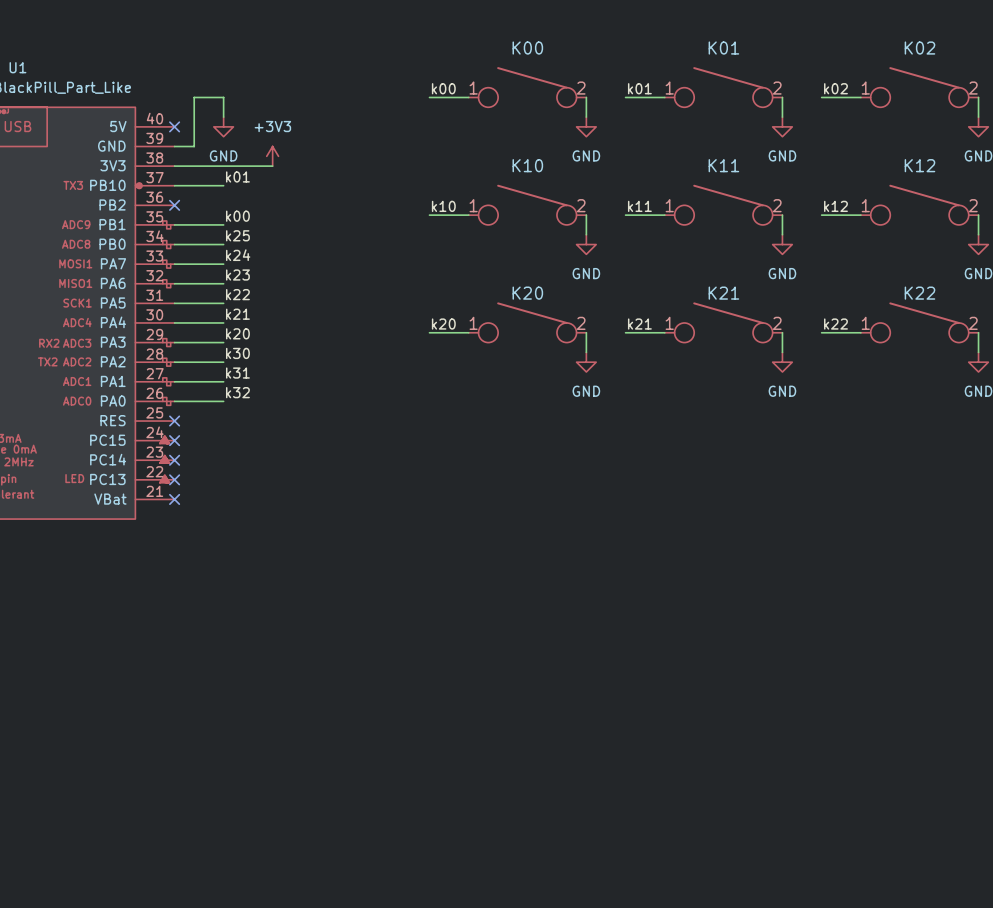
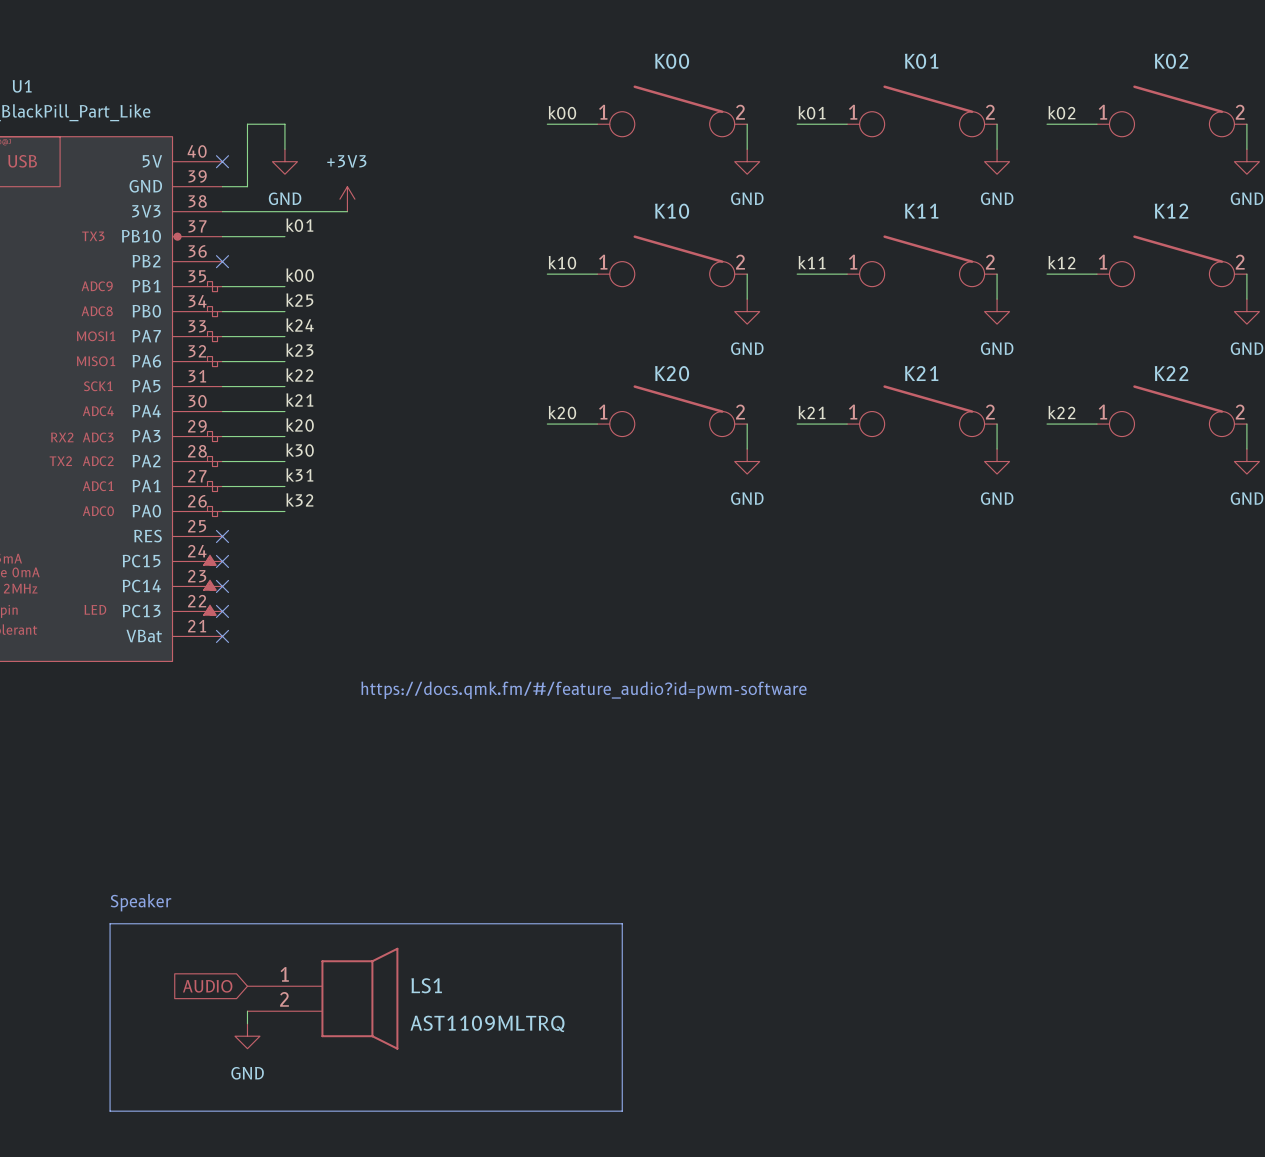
text: none -> https://docs.qmk.fm/#/feature_audio?id=pwm-software (583, 690)
text: none -> Speaker (141, 902)
line: none -> (110, 923) (622, 923) (622, 1111) (110, 1111) (110, 923)
global label: none -> AUDIO (207, 986)
LS1: none -> AST1109MLTRQ (322, 998)
wire: none -> (247, 1011) (247, 1023)
power symbol: none -> GND (247, 1036)

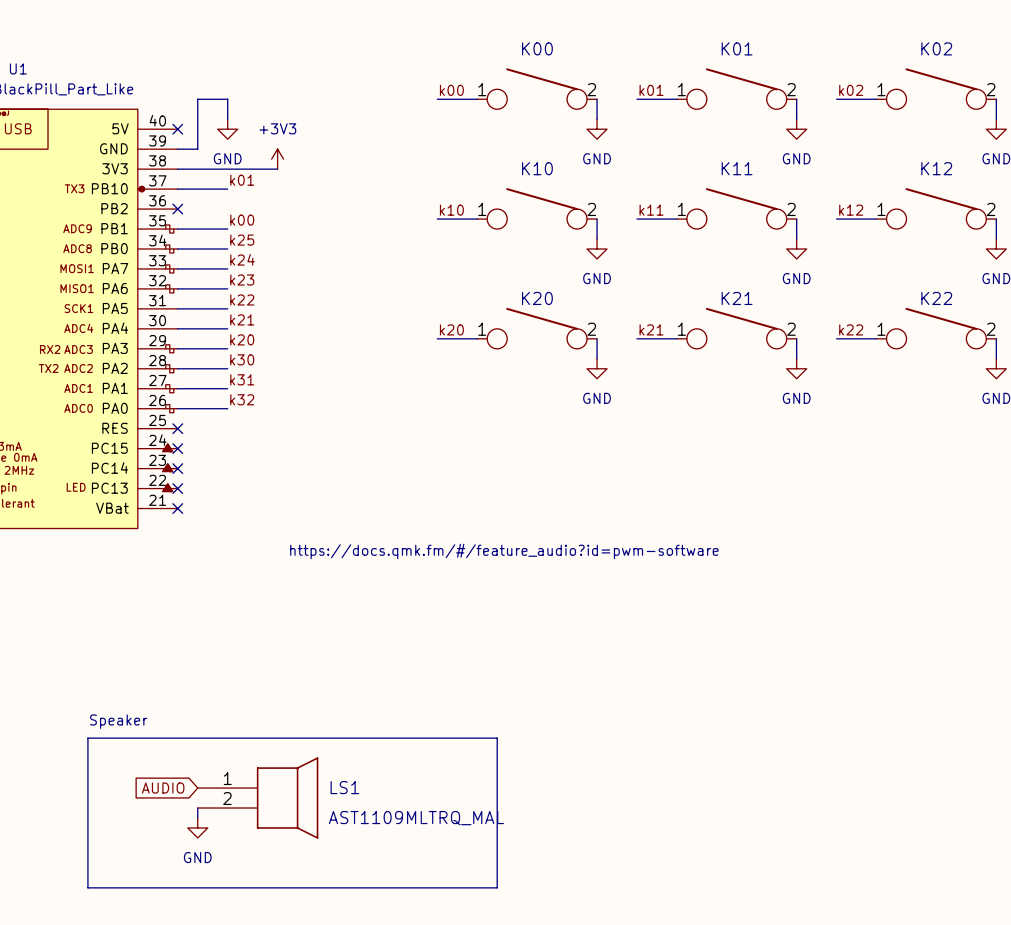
LS1 value: AST1109MLTRQ (487, 1023) -> AST1109MLTRQ_MAL (416, 818)

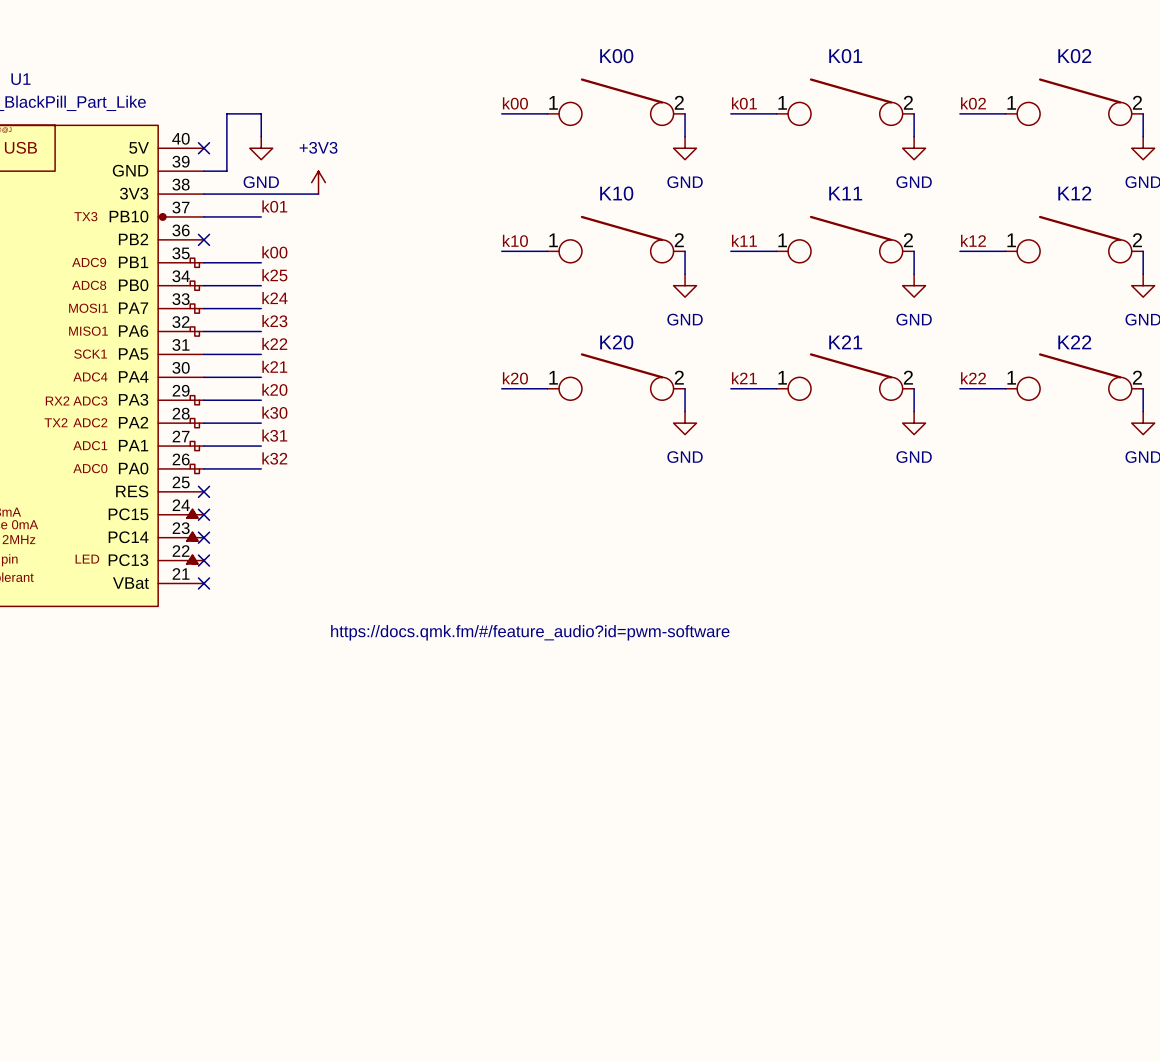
text: Speaker (118, 721) -> none
line: (87, 738) (497, 738) (497, 887) (87, 887) (87, 738) -> none
global label: AUDIO (163, 788) -> none
LS1: AST1109MLTRQ_MAL (258, 798) -> none
wire: (197, 808) (197, 817) -> none
power symbol: GND (197, 827) -> none

